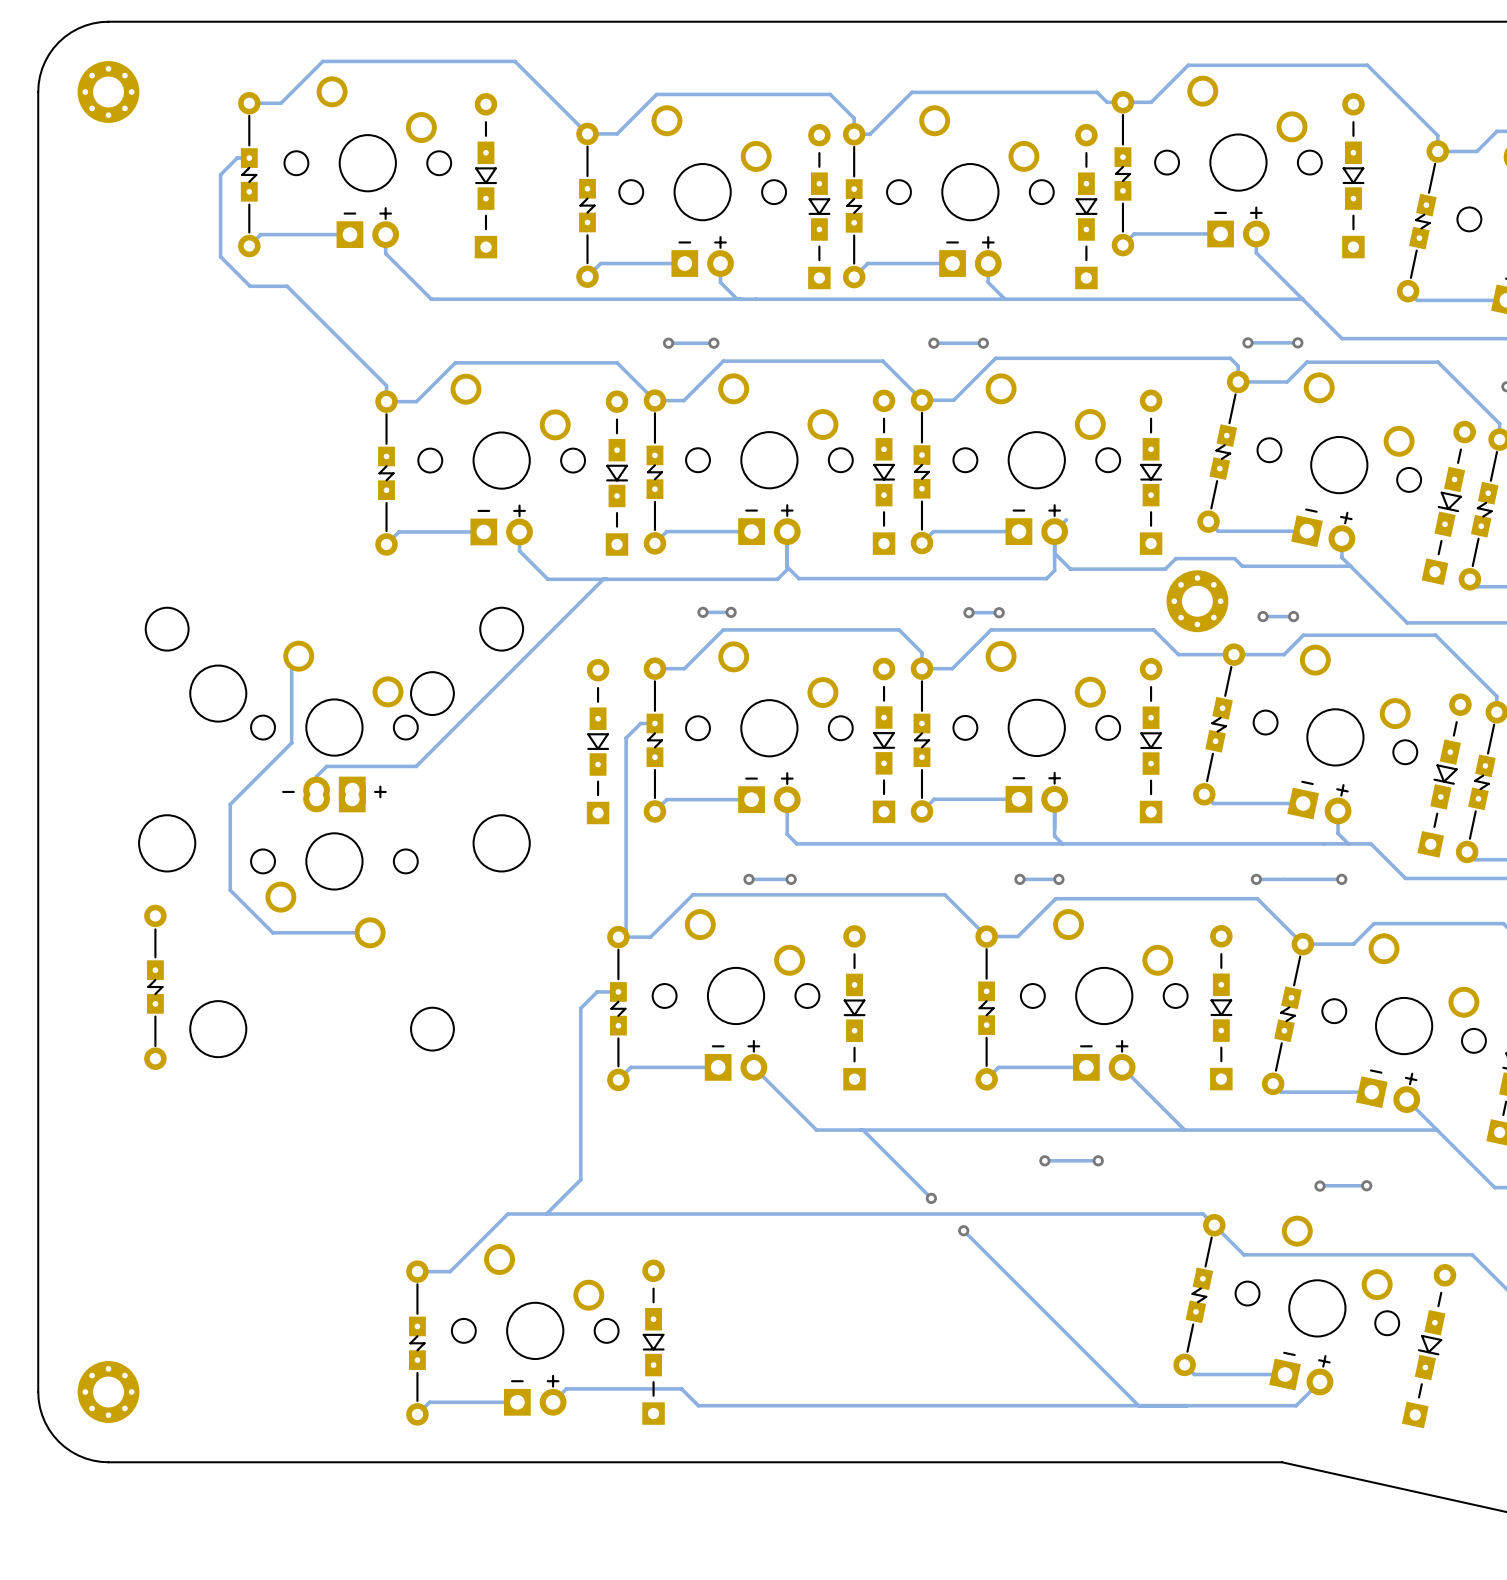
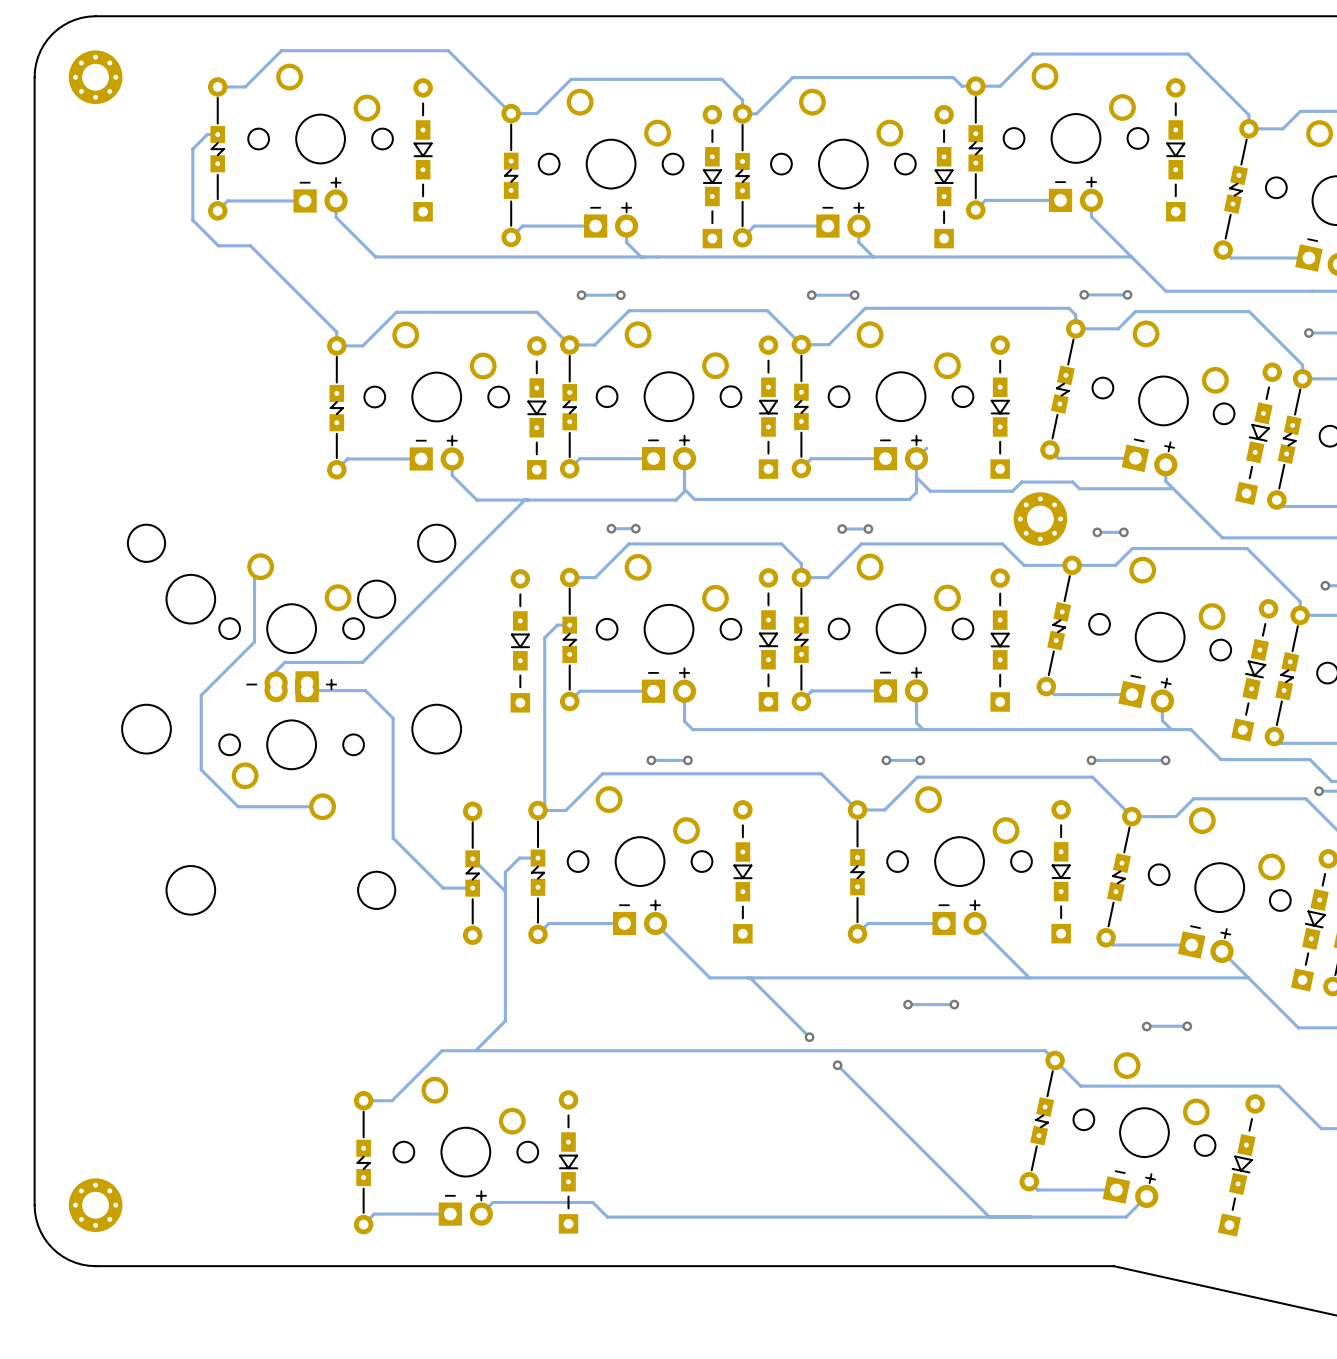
track: none -> (307, 690) (365, 690) (393, 718) (393, 838) (443, 888) (472, 888)
part: (155, 987) -> none
track: none -> (472, 858) (505, 891)
part: none -> (472, 873)

